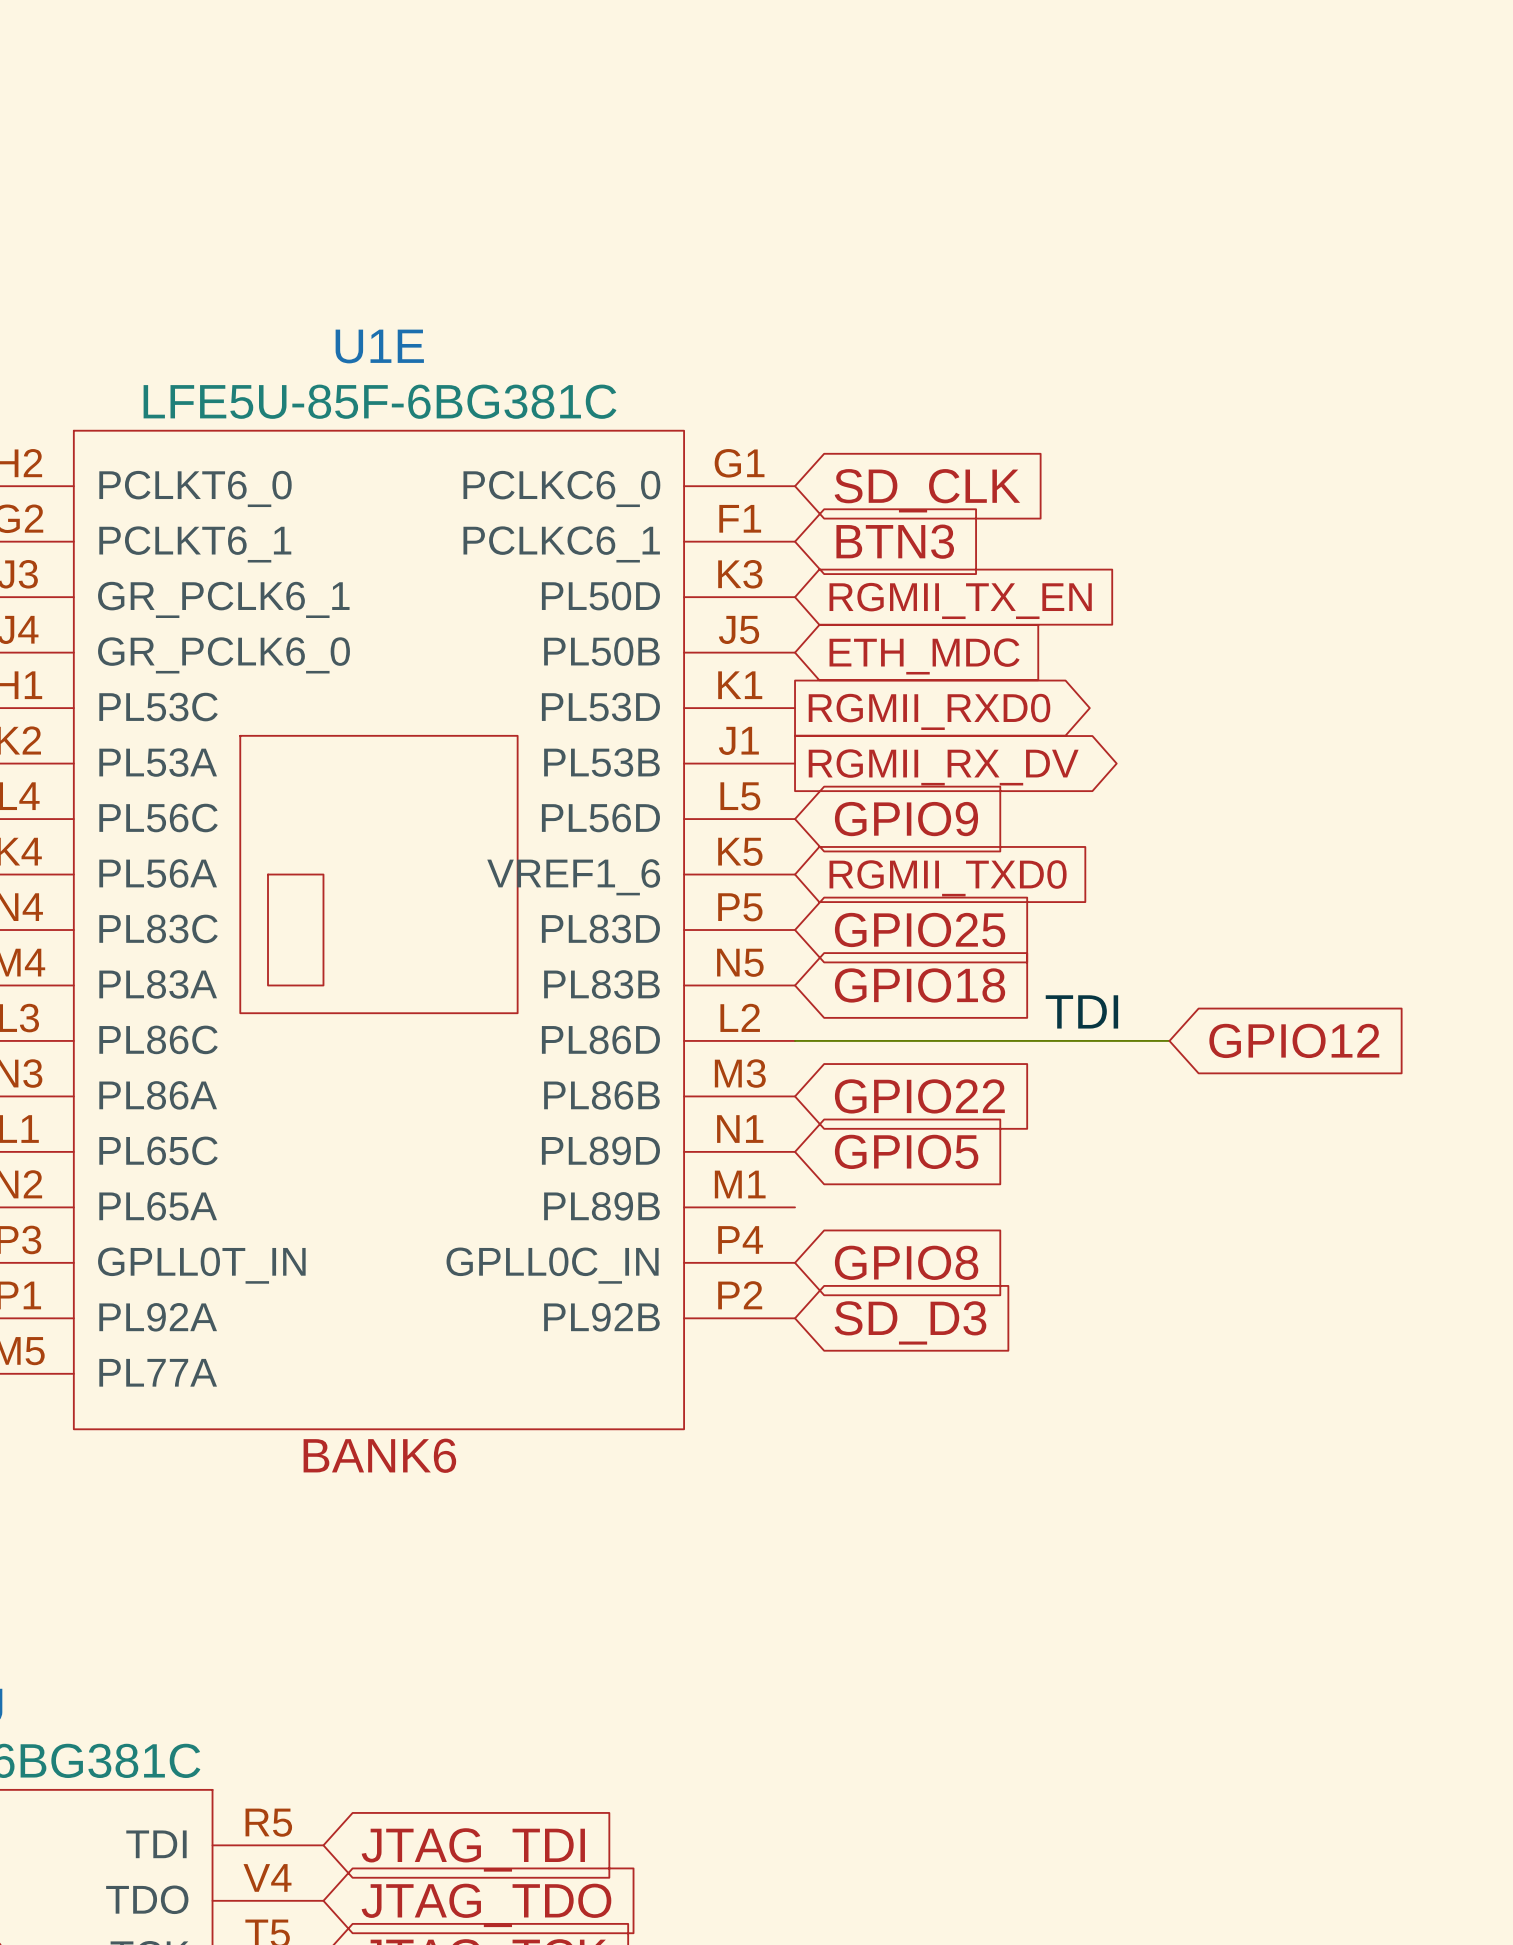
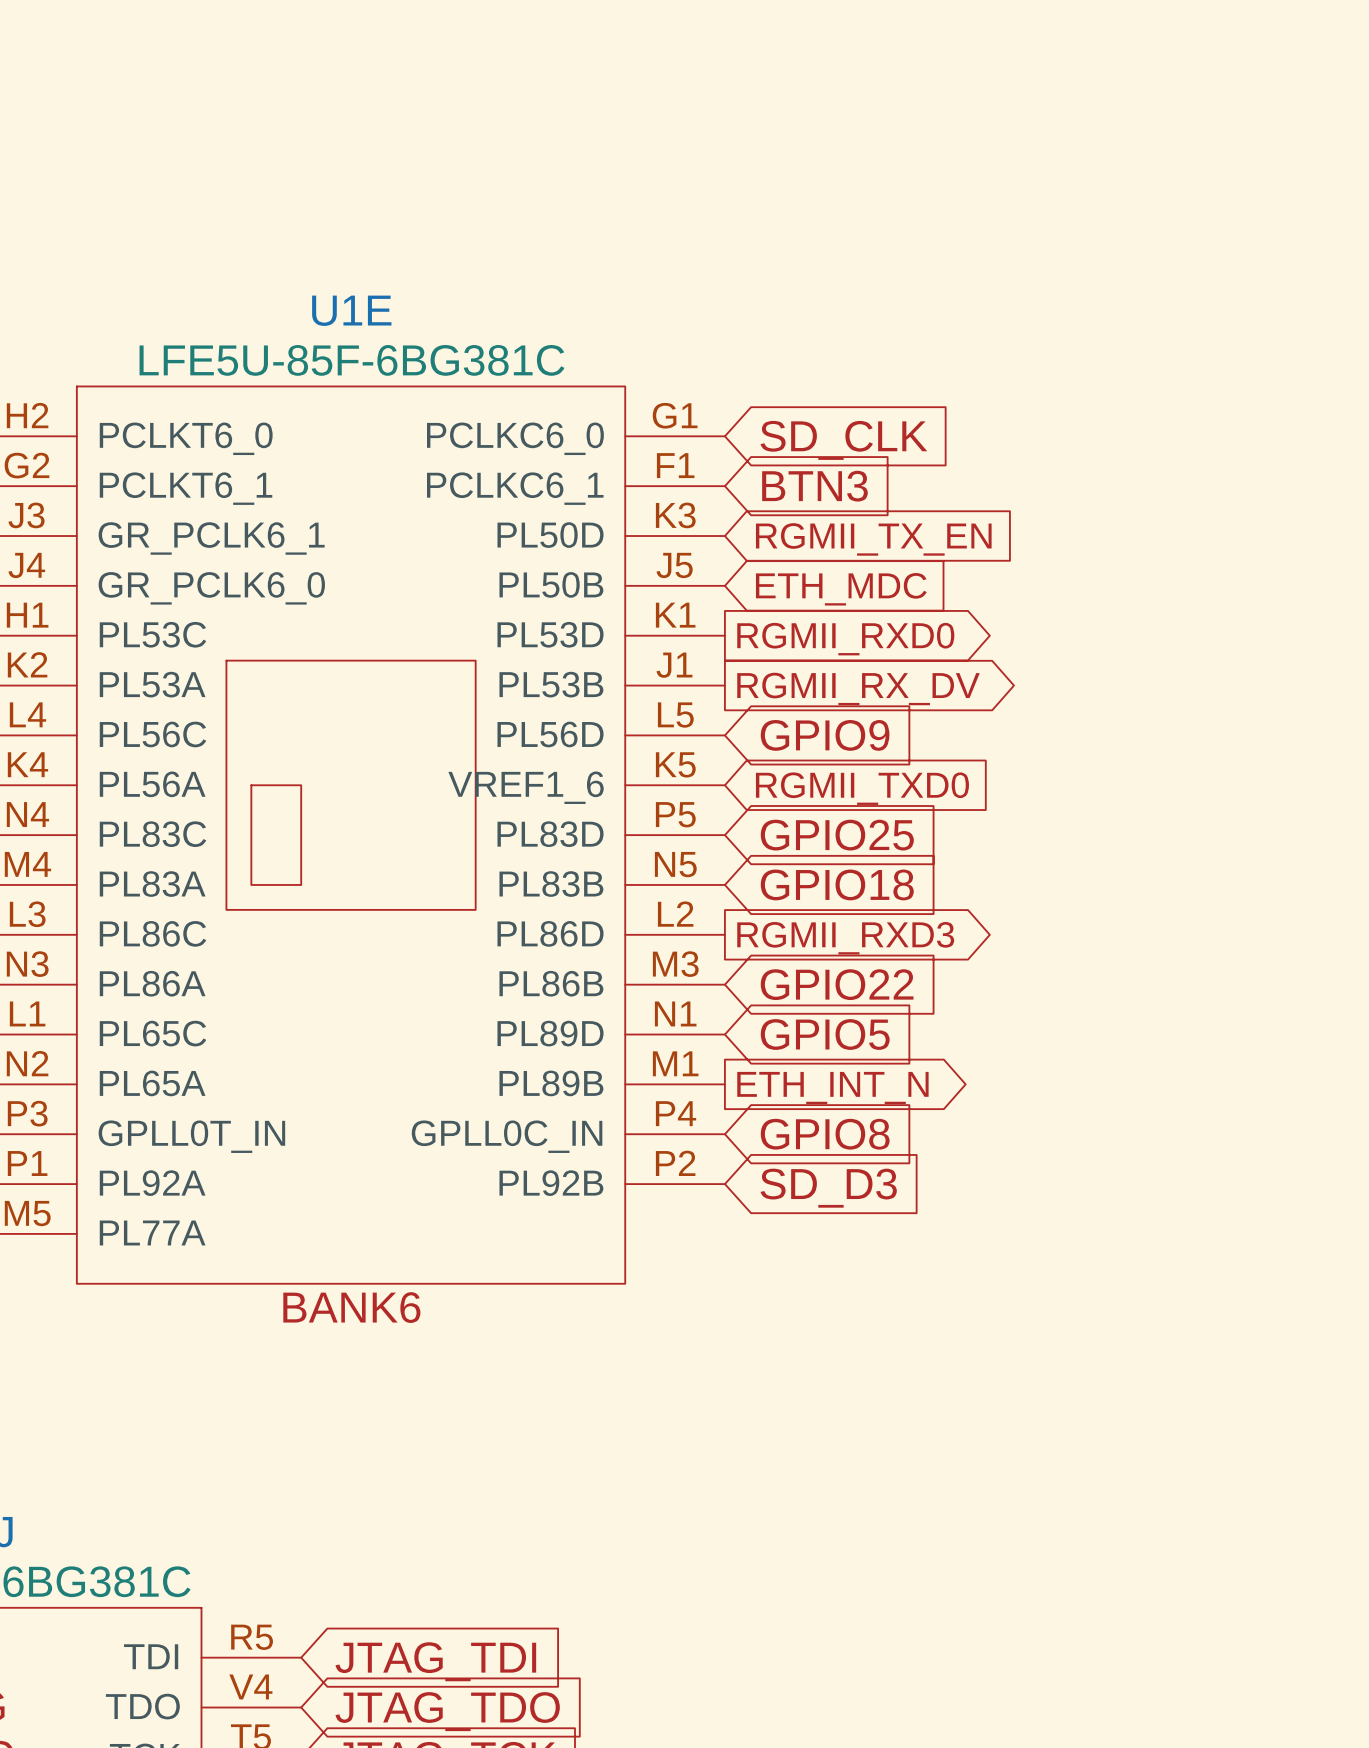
label: TDI (1081, 1011) -> none
wire: (795, 1040) (1169, 1040) -> none
global label: GPIO12 (1294, 1040) -> none
global label: none -> RGMII_RXD3 (845, 938)
global label: none -> ETH_INT_N (832, 1087)

